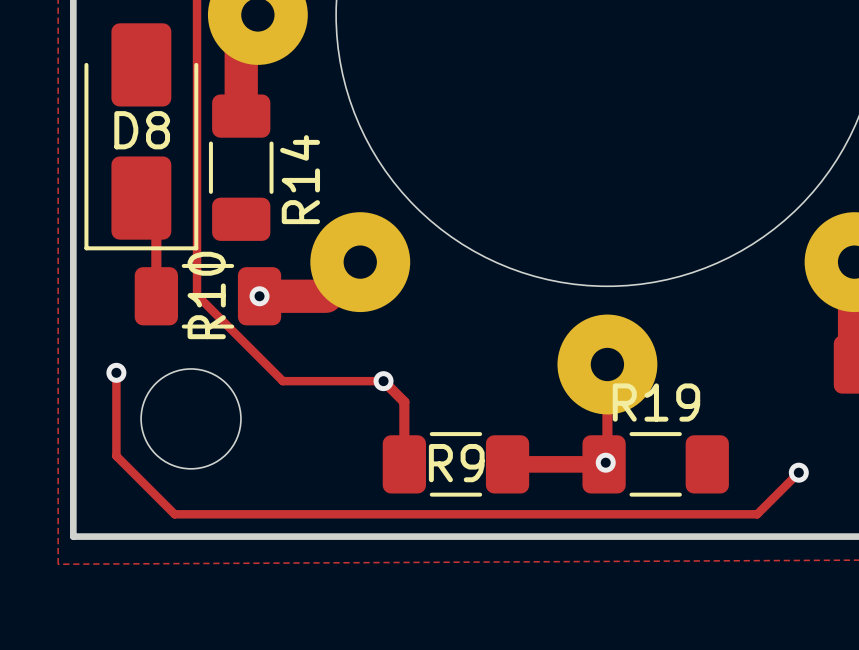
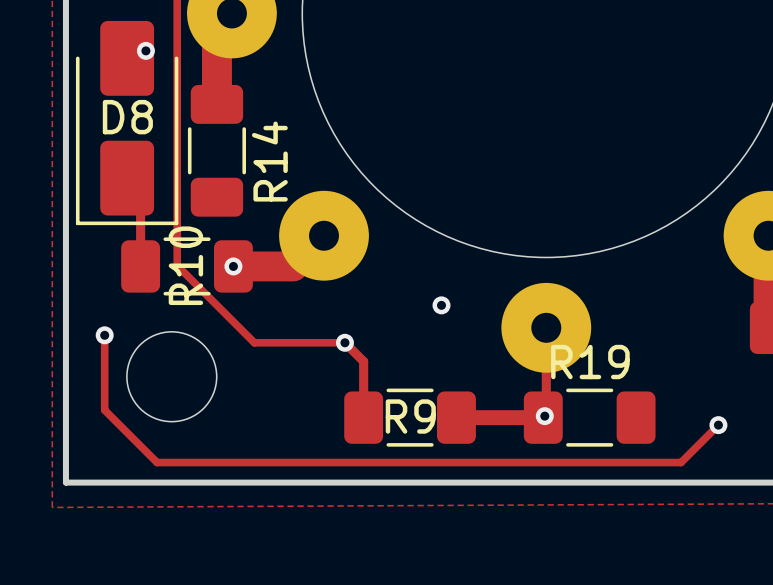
via: none -> (145, 50)
via: none -> (441, 305)

